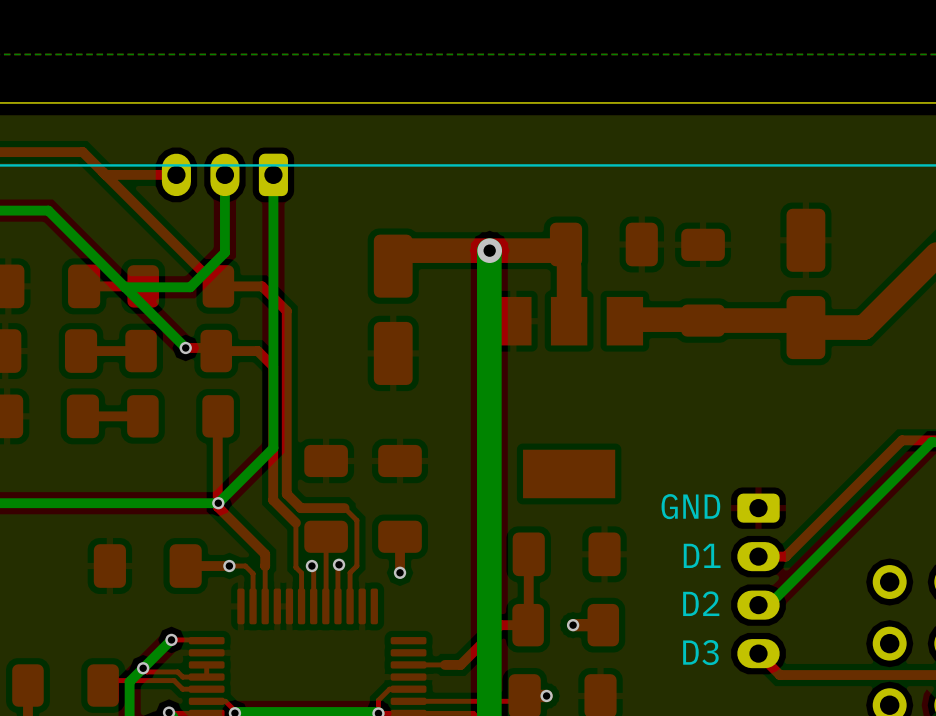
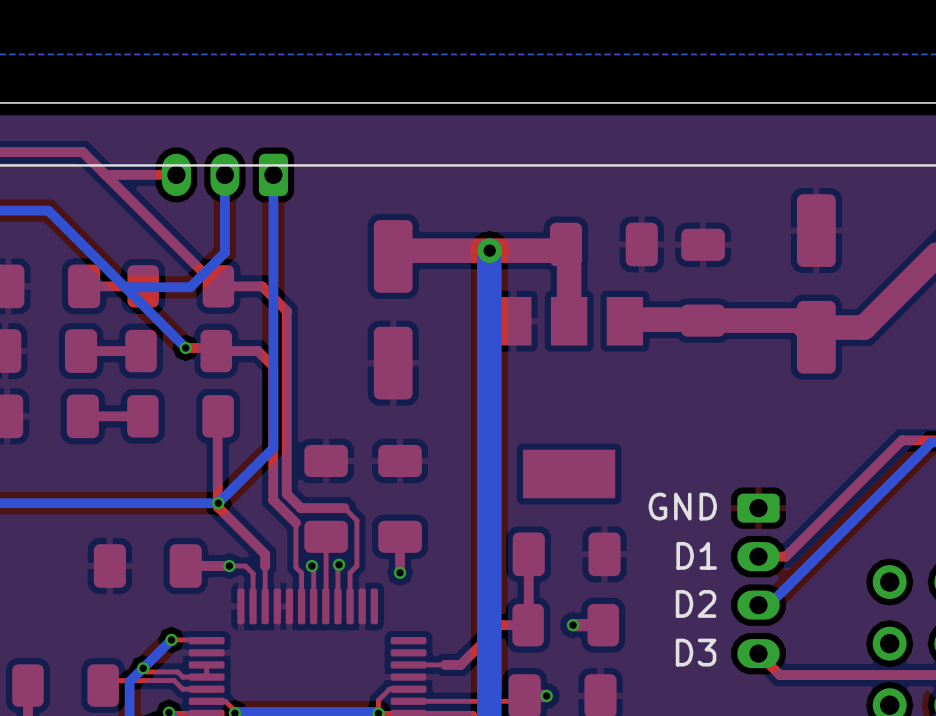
part footprint: [786, 208, 826, 360] -> [796, 194, 836, 374]
part footprint: [373, 234, 413, 385] -> [373, 220, 413, 400]

